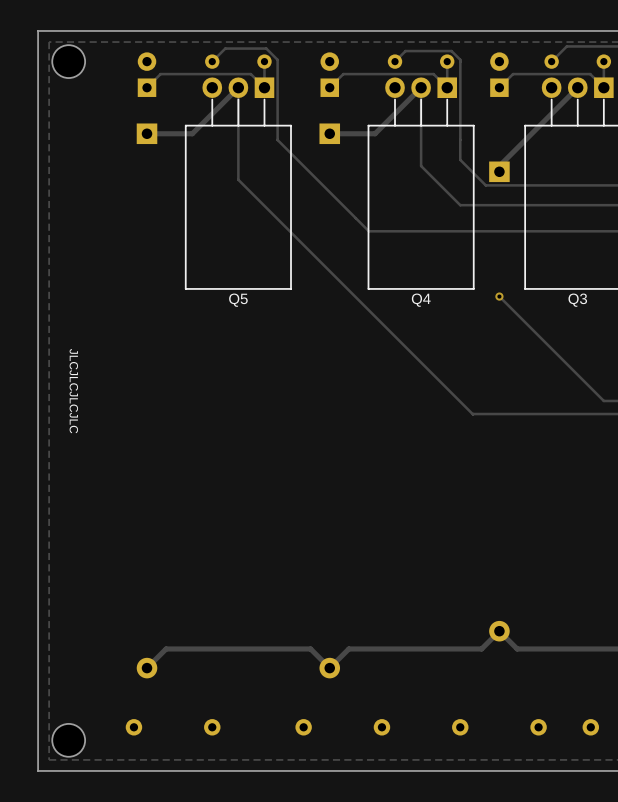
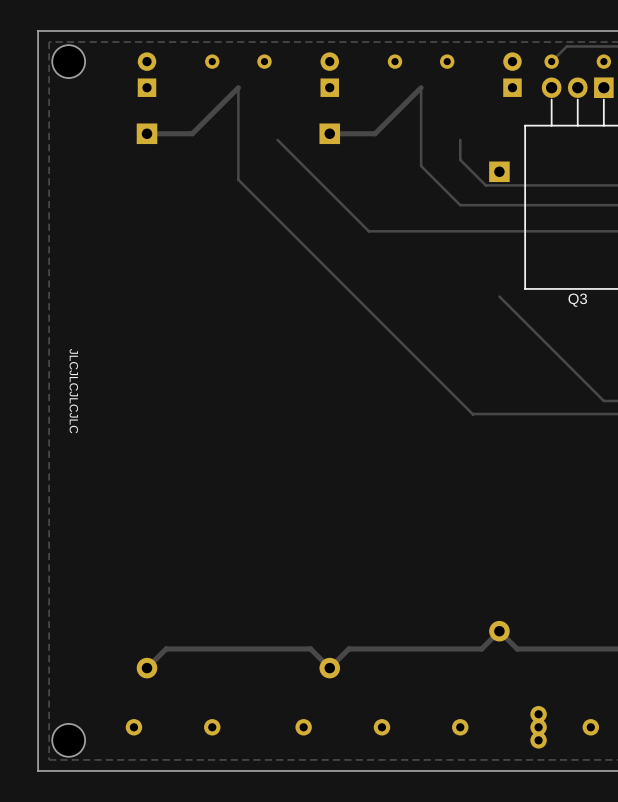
track: (212, 61) (225, 48) (266, 48) (277, 59) (277, 139) -> none
track: (264, 61) (264, 87) (250, 74) (160, 74) (147, 87) -> none
track: (447, 61) (447, 87) (433, 74) (343, 74) (329, 87) -> none
track: (460, 61) (451, 51) (405, 51) (395, 61) -> none
track: (460, 61) (460, 139) -> none
track: (603, 61) (603, 87) (590, 74) (513, 74) (499, 87) -> none
part position: (499, 74) -> (512, 74)
track: (577, 87) (499, 166) (499, 171) -> none
Q5: (238, 183) -> none
Q4: (421, 183) -> none
via: (499, 296) -> none
part: none -> (538, 727)

